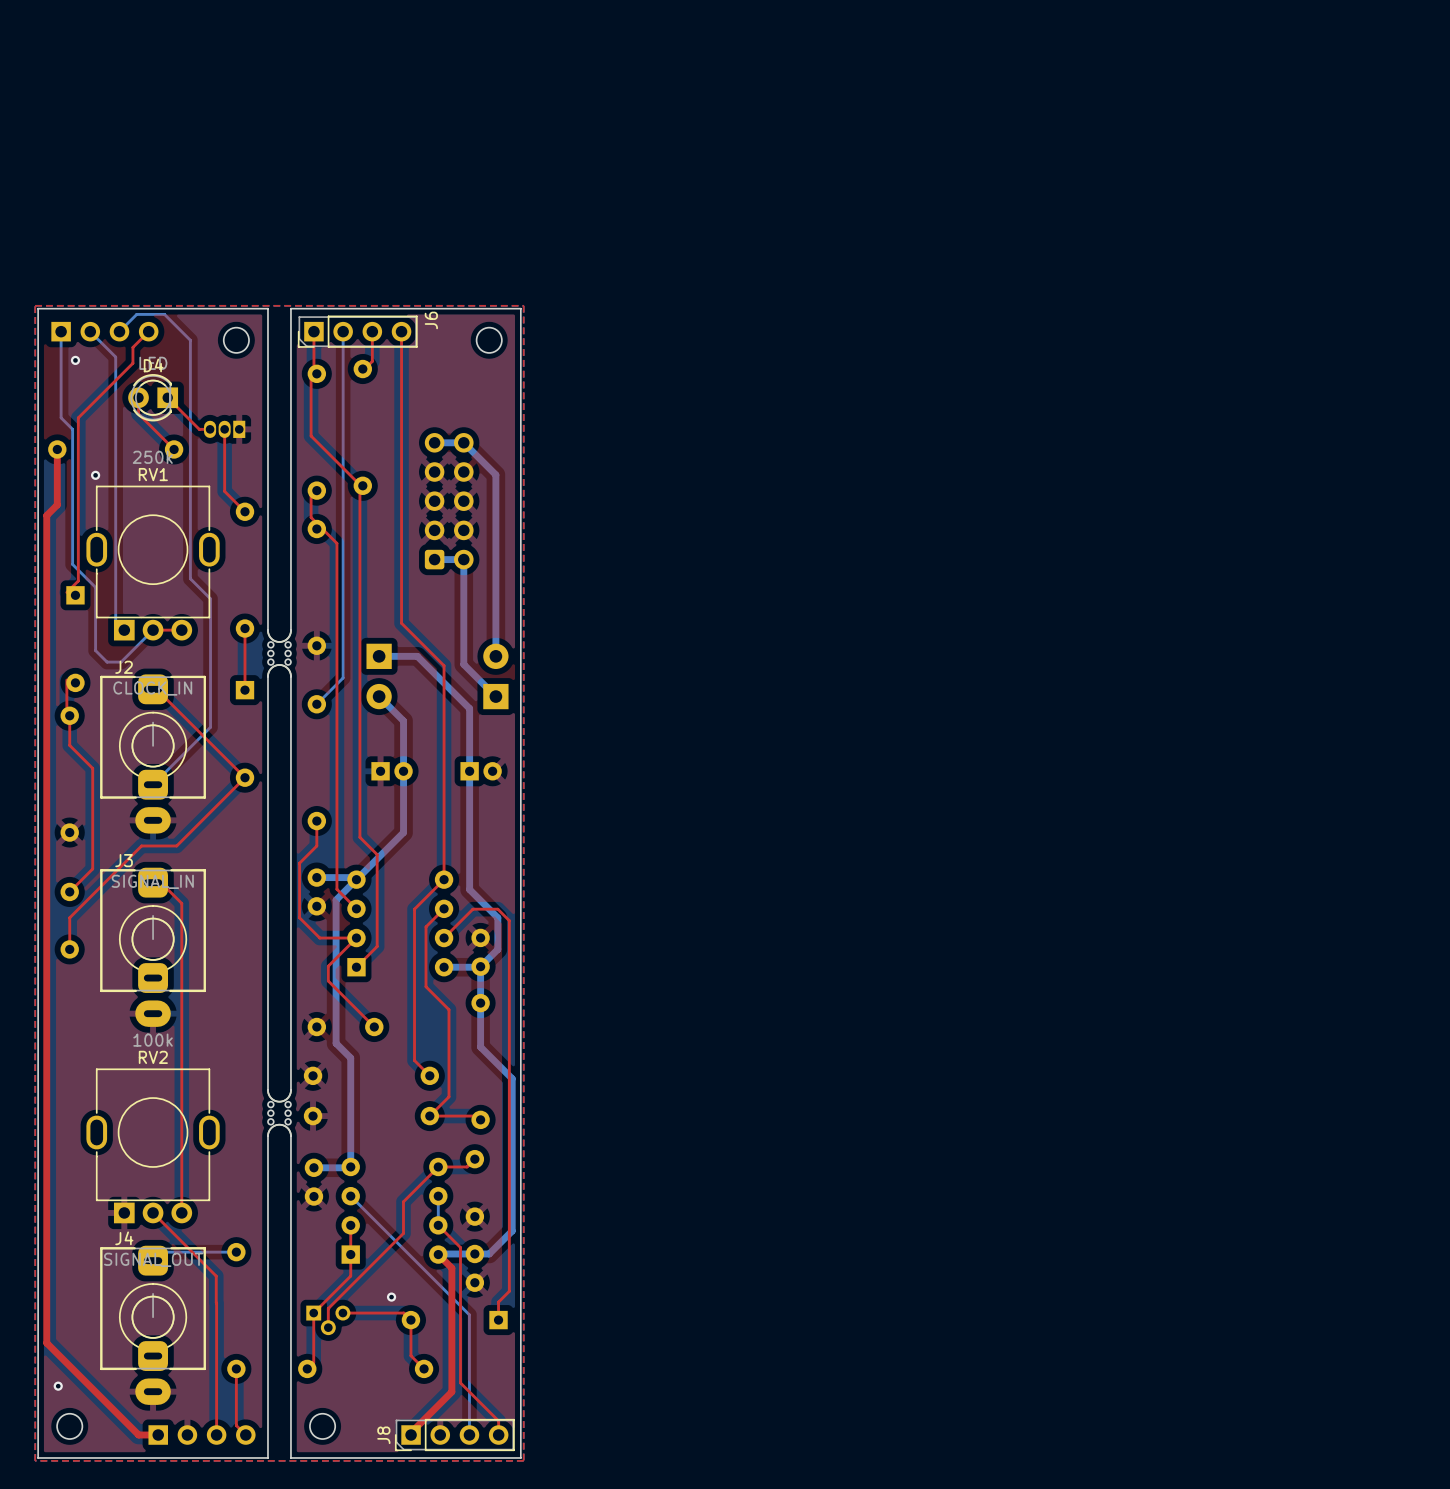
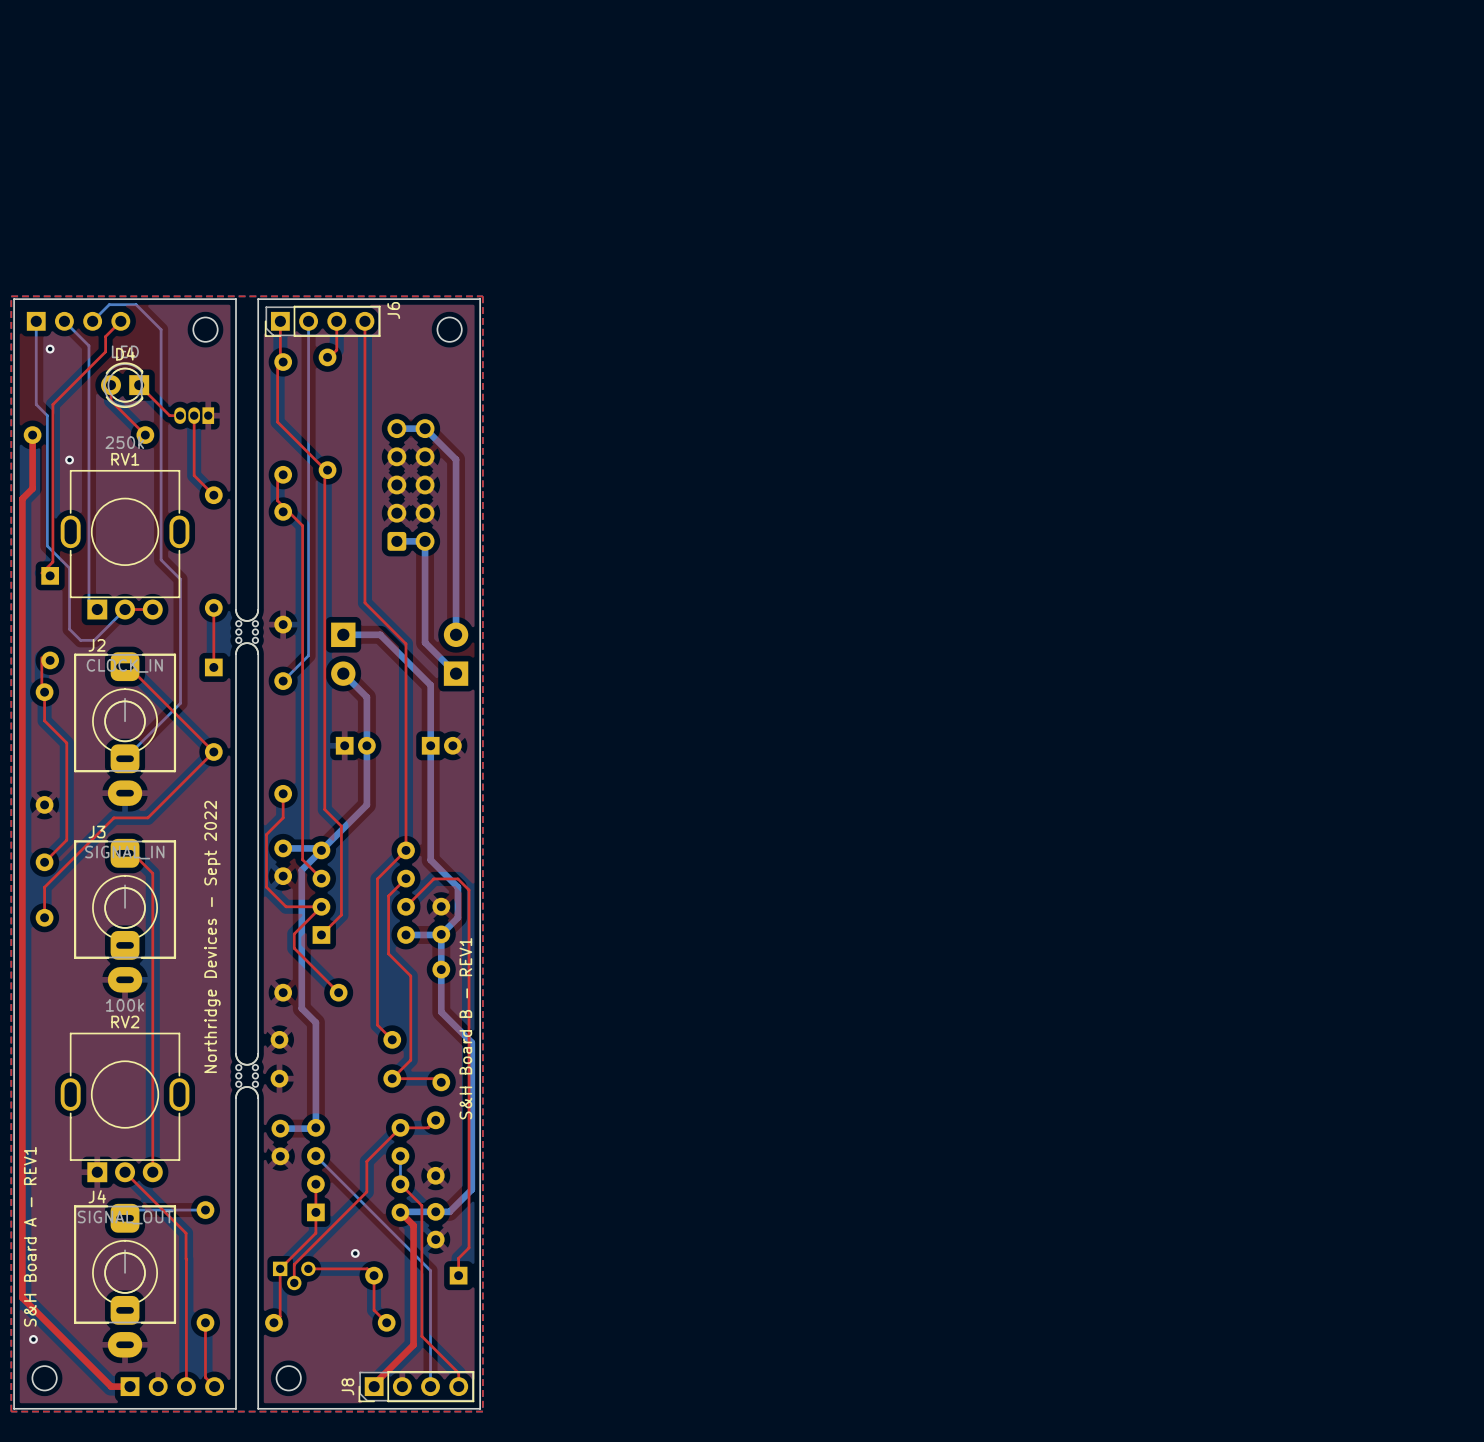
text: none -> Northridge Devices - Sept 2022 (212, 936)
text: none -> S&H Board B - REV1 (465, 1028)
text: none -> S&H Board A - REV1 (30, 1236)

